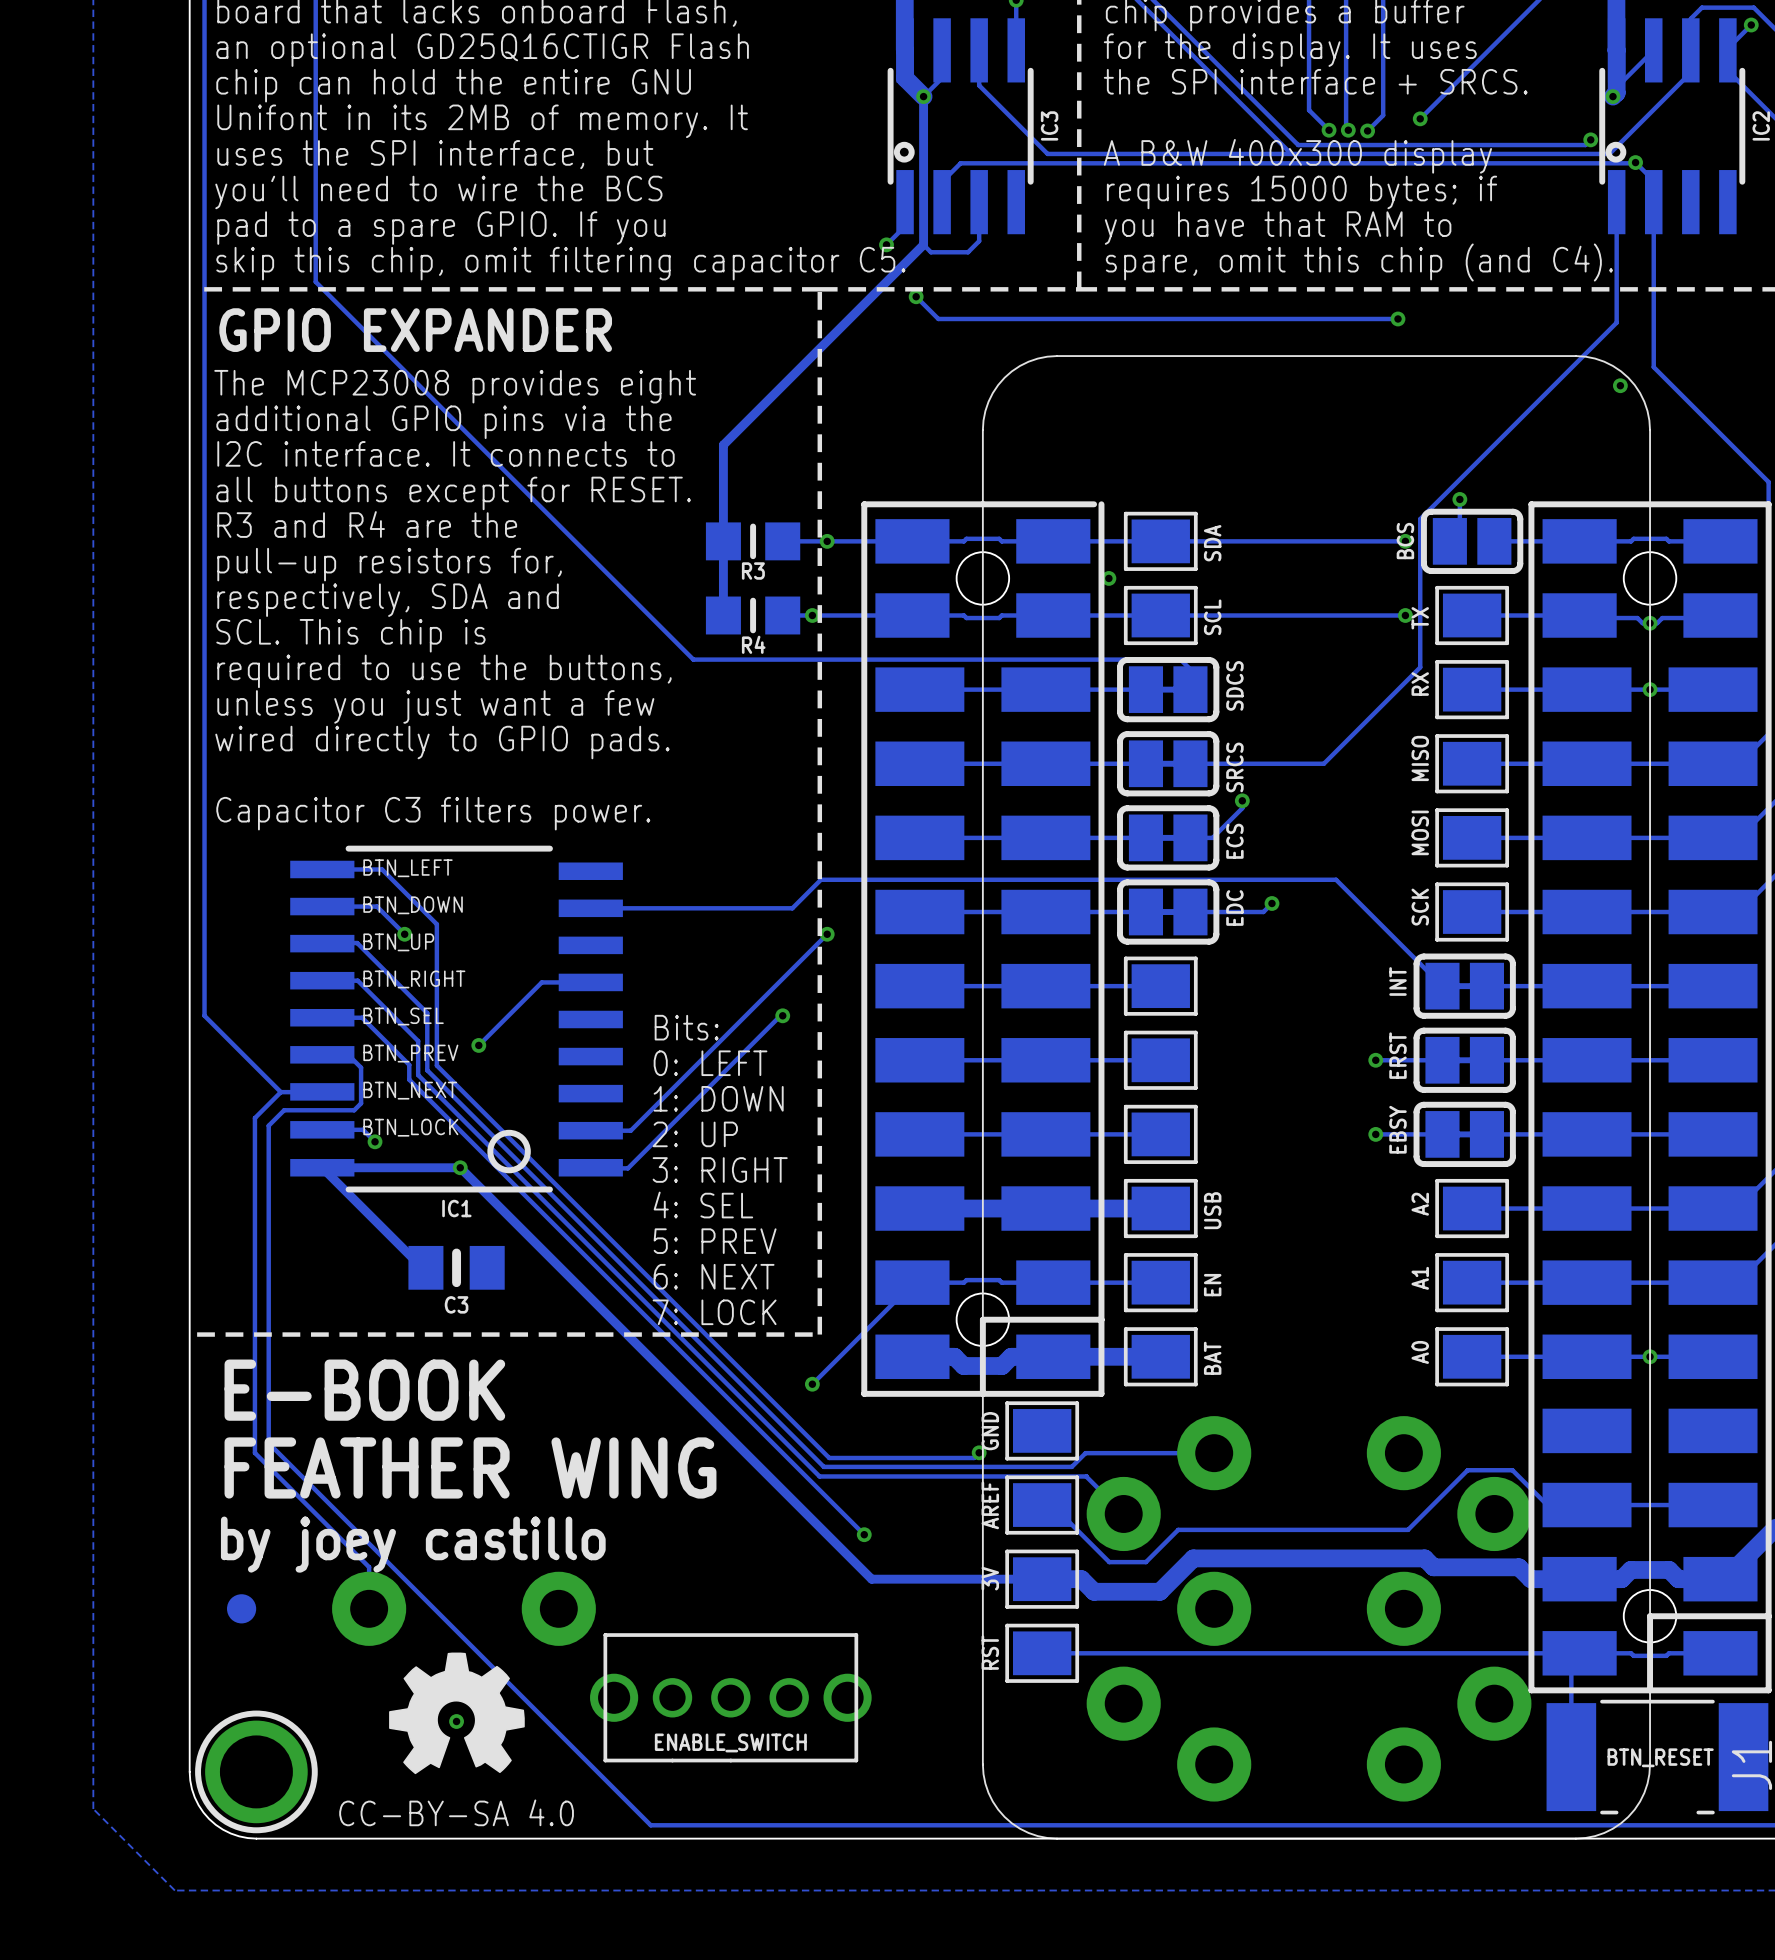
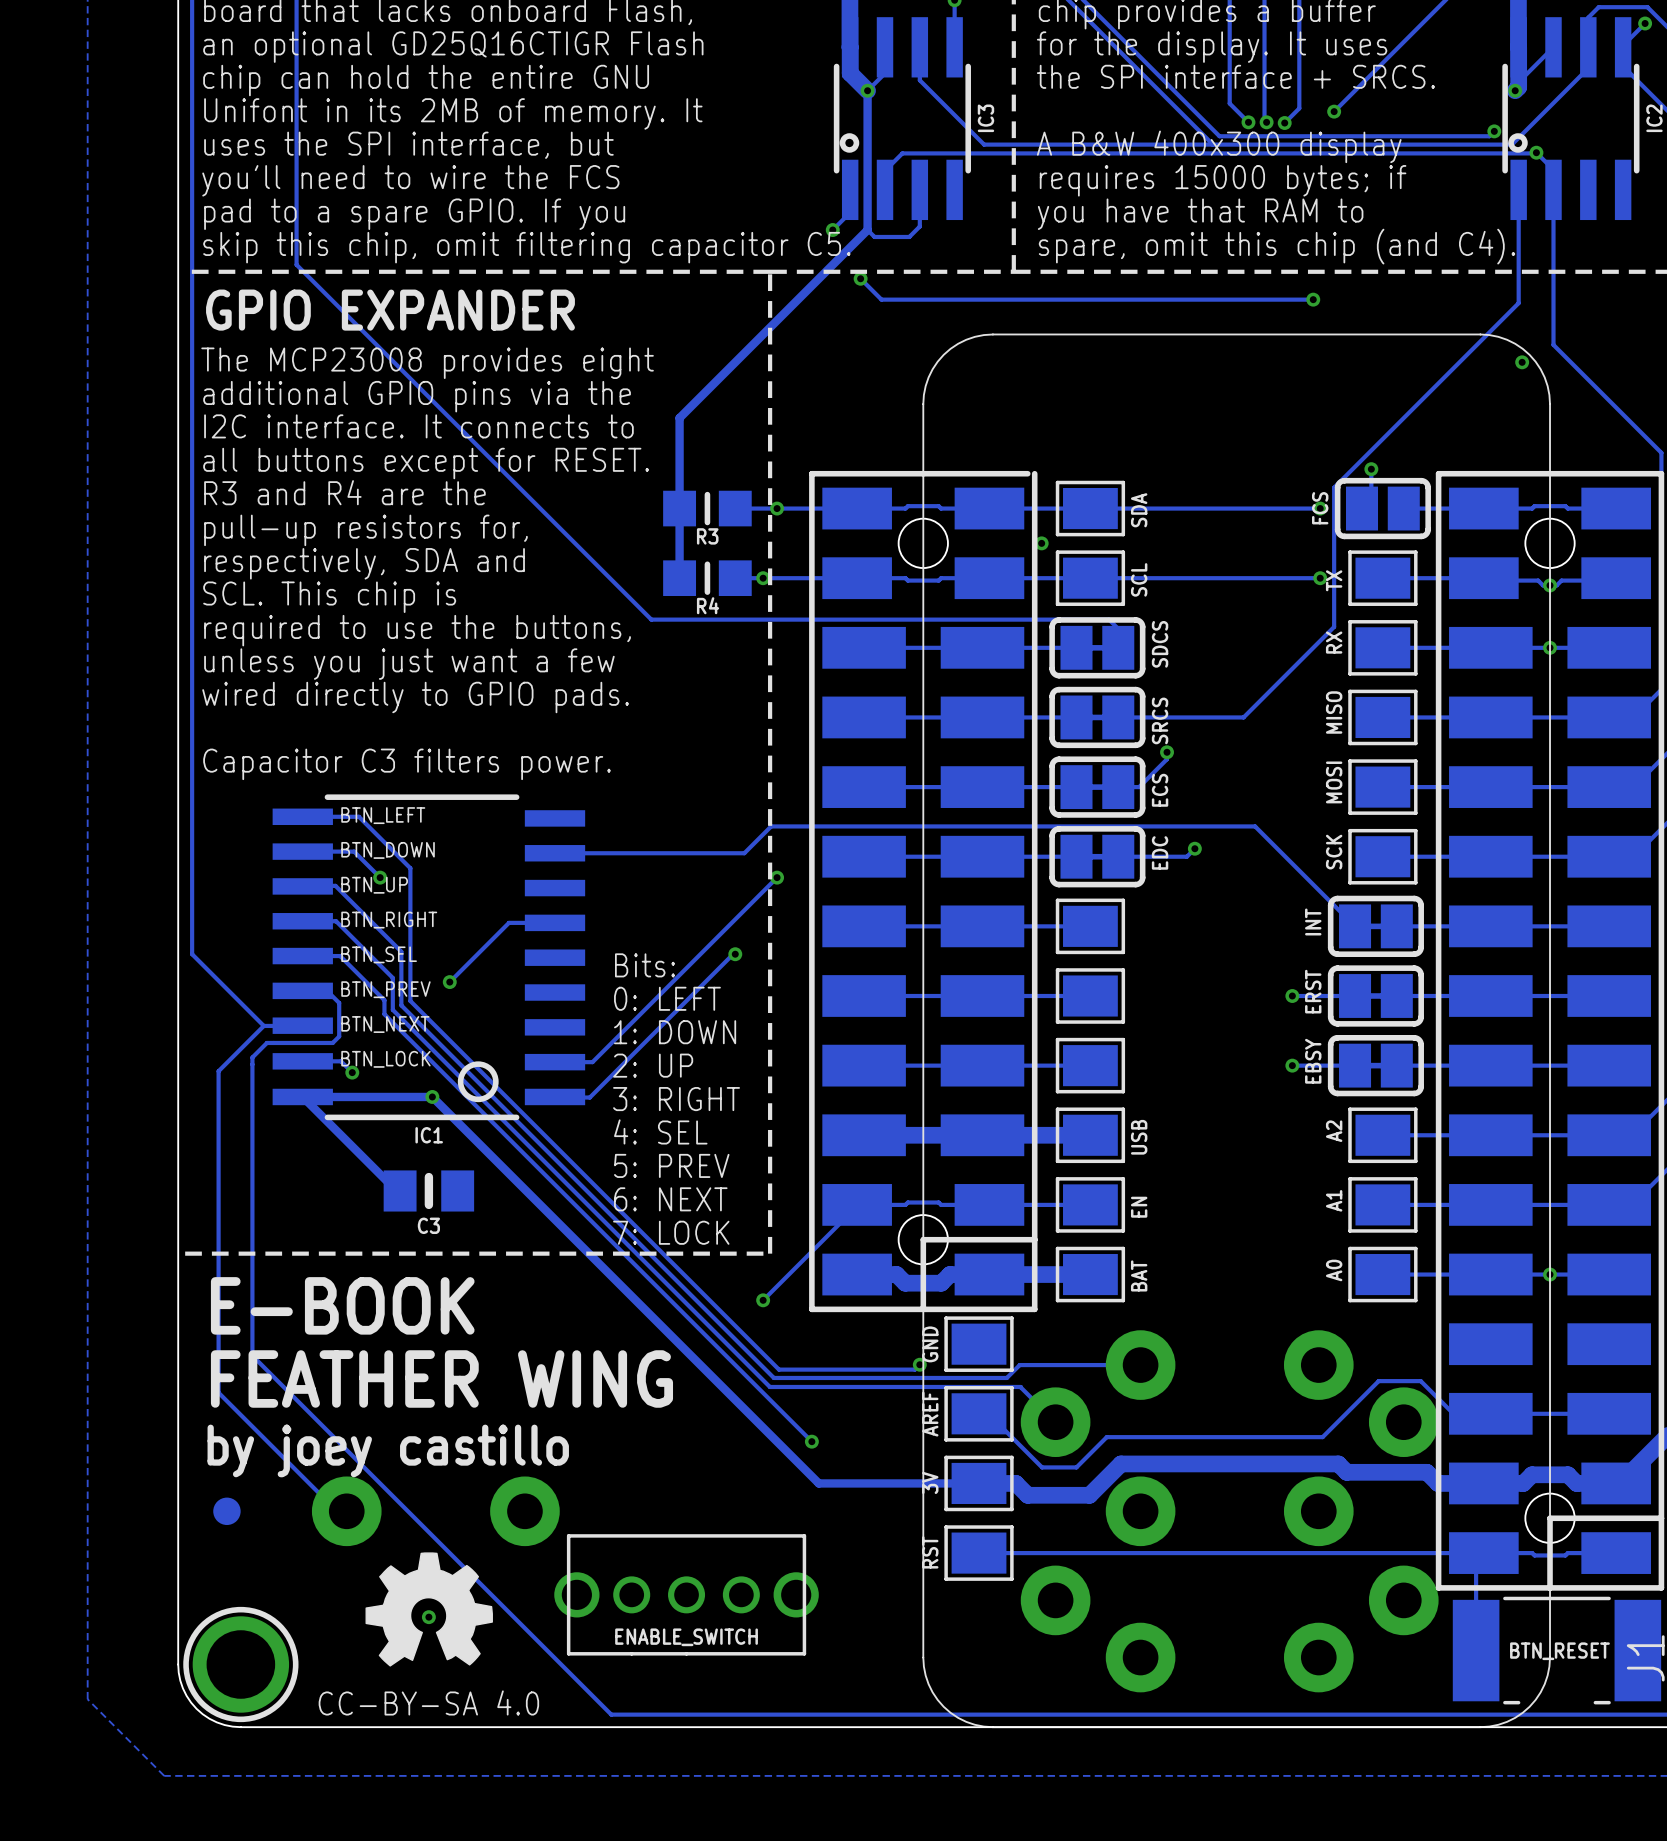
text: you'll need to wire the BCS (438, 192) -> you'll need to wire the FCS (410, 180)
BCS name: BCS (1405, 541) -> FCS (1320, 508)
track: (254, 1118) (254, 1452) (369, 1567) (369, 1608) -> (239, 1050) (218, 1071) (218, 1392) (337, 1511) (346, 1511)

